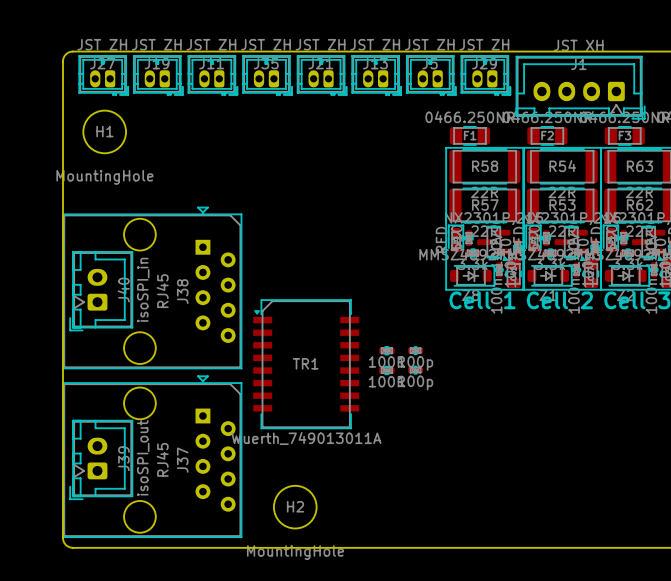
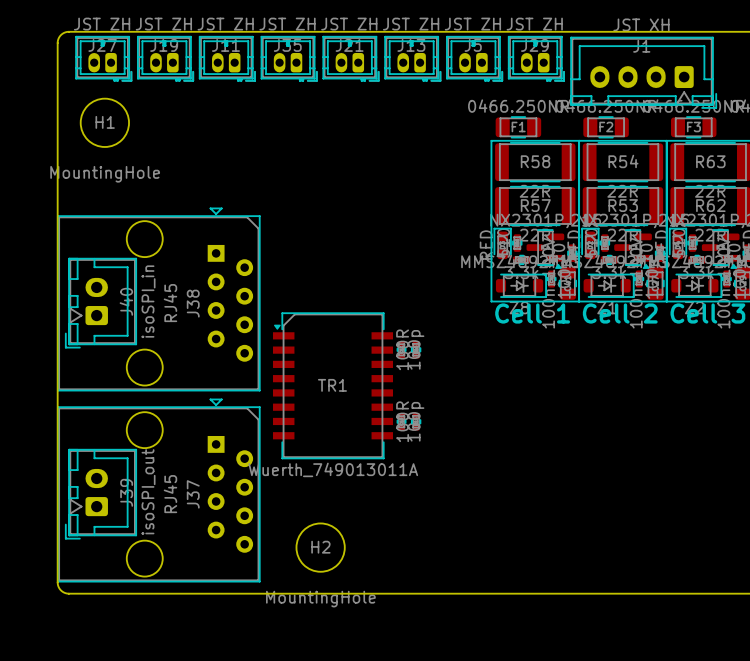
part rotation: 0° (386, 350) -> 90° clockwise (416, 421)
part position: (386, 350) -> (416, 421)
part rotation: 0° (415, 350) -> 90° clockwise (401, 421)
part position: (415, 350) -> (401, 421)
part rotation: 0° (386, 370) -> 90° clockwise (416, 349)
part position: (386, 370) -> (416, 349)
part rotation: 0° (415, 370) -> 90° clockwise (401, 349)
part position: (415, 370) -> (401, 349)

